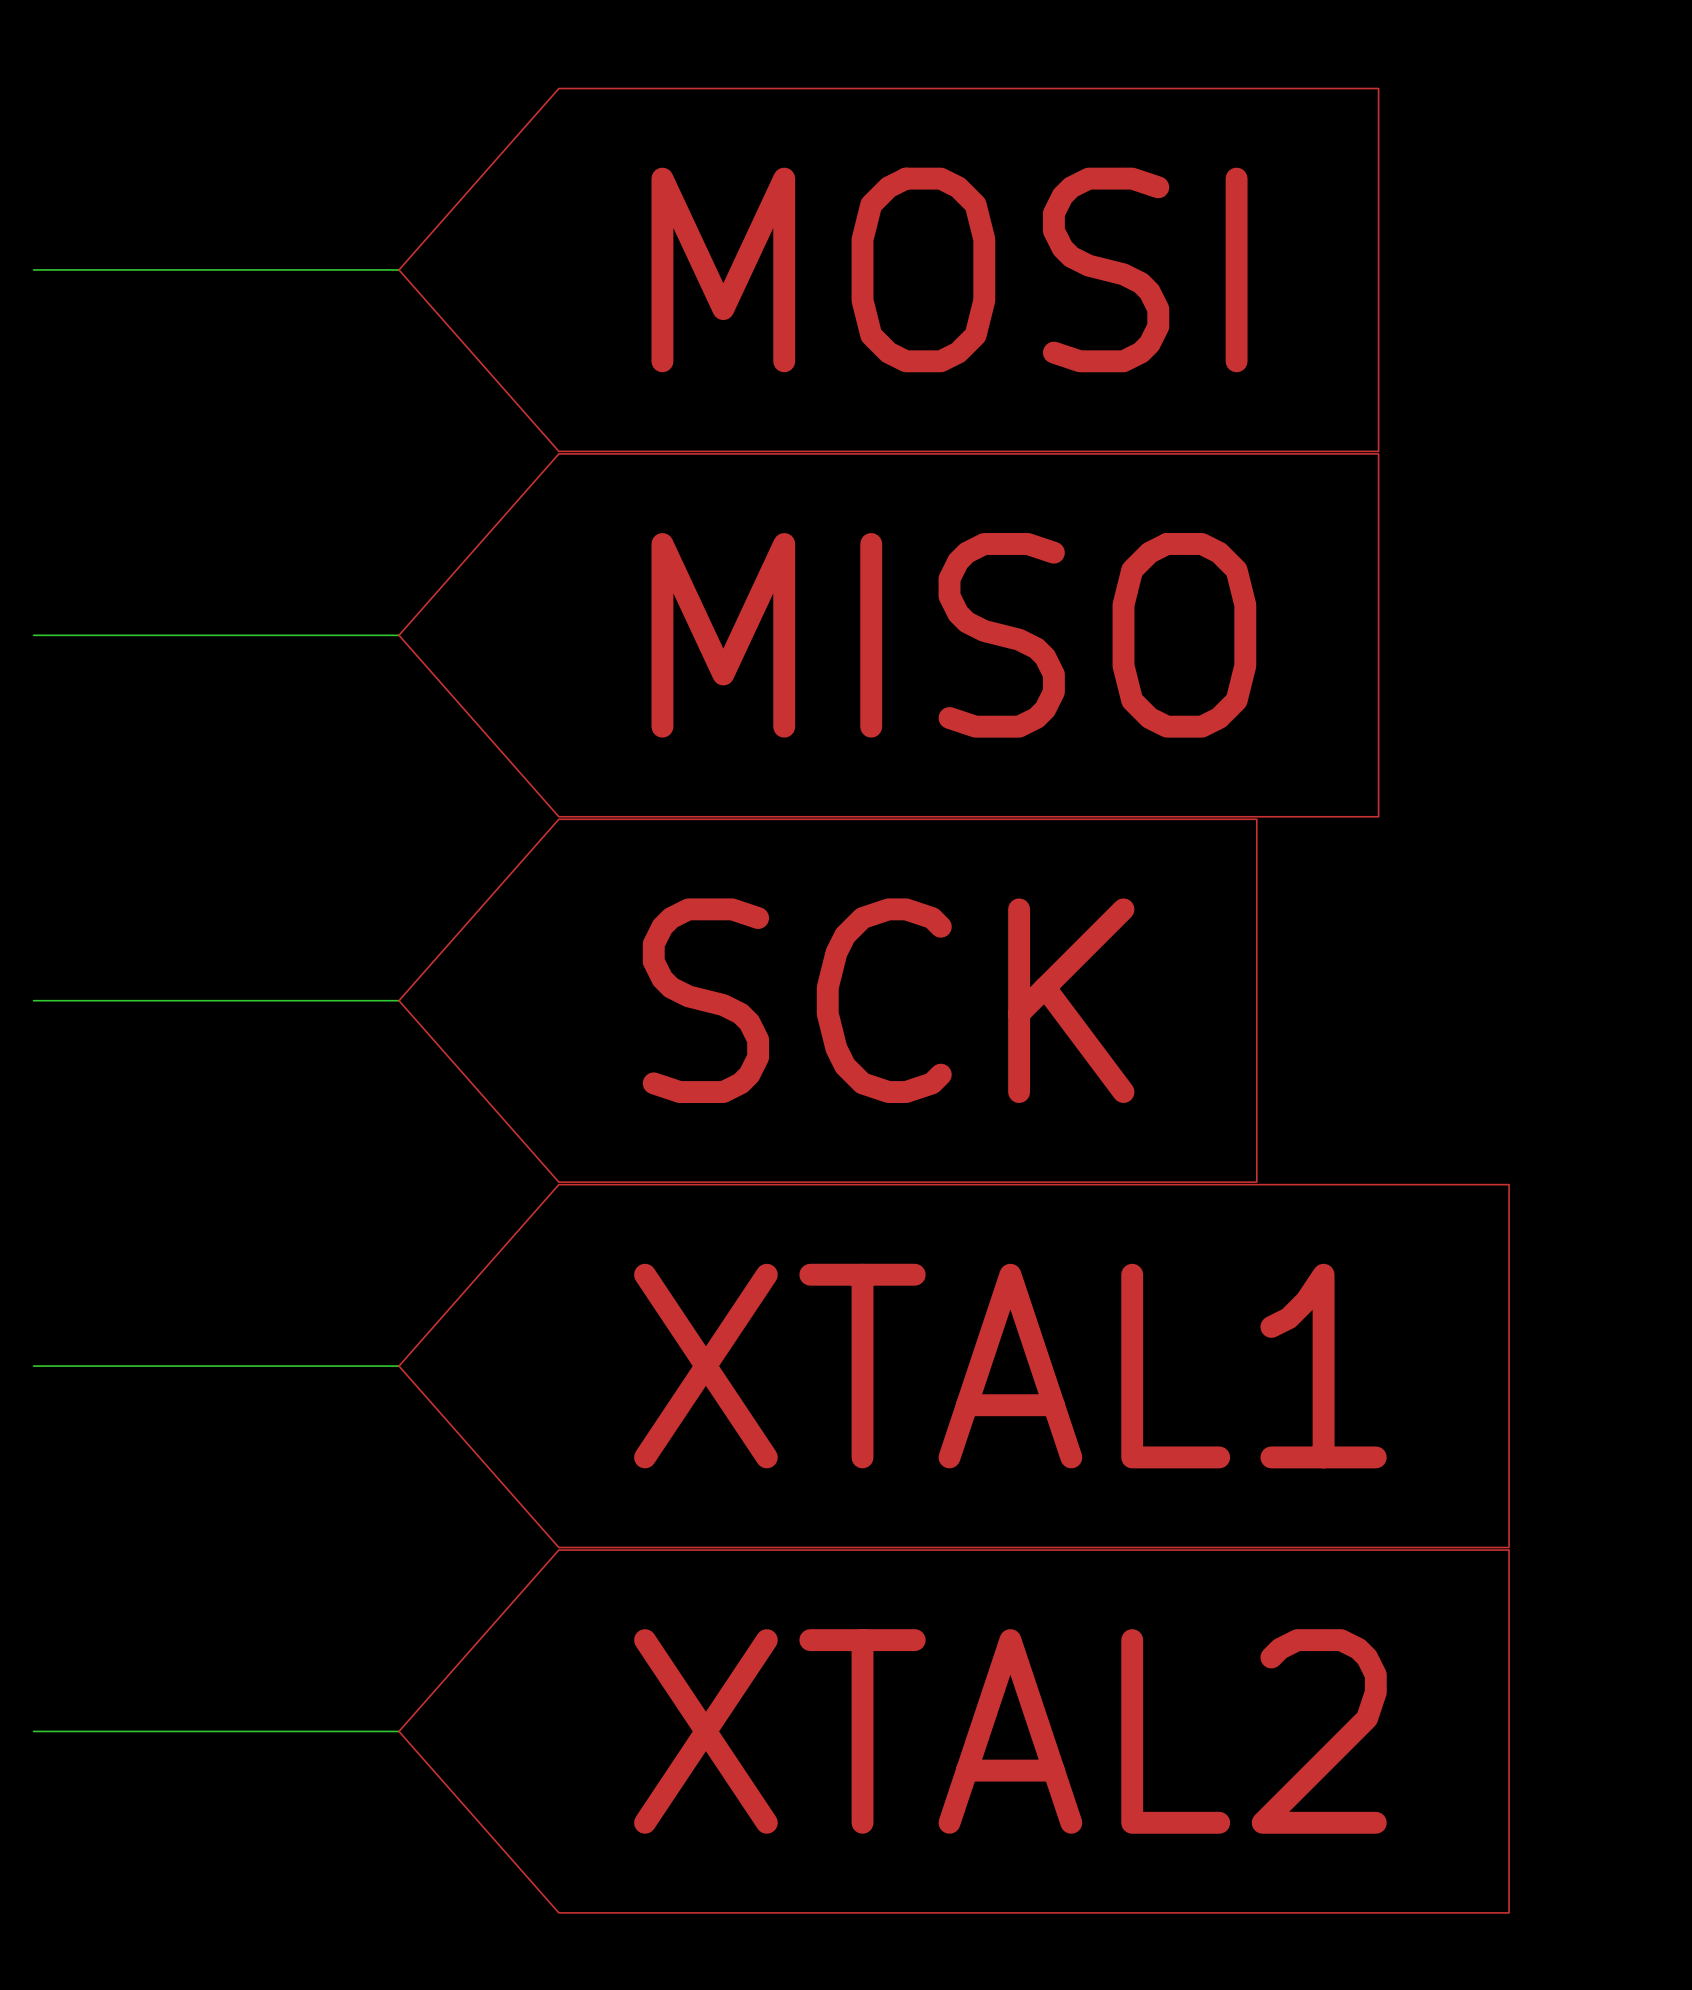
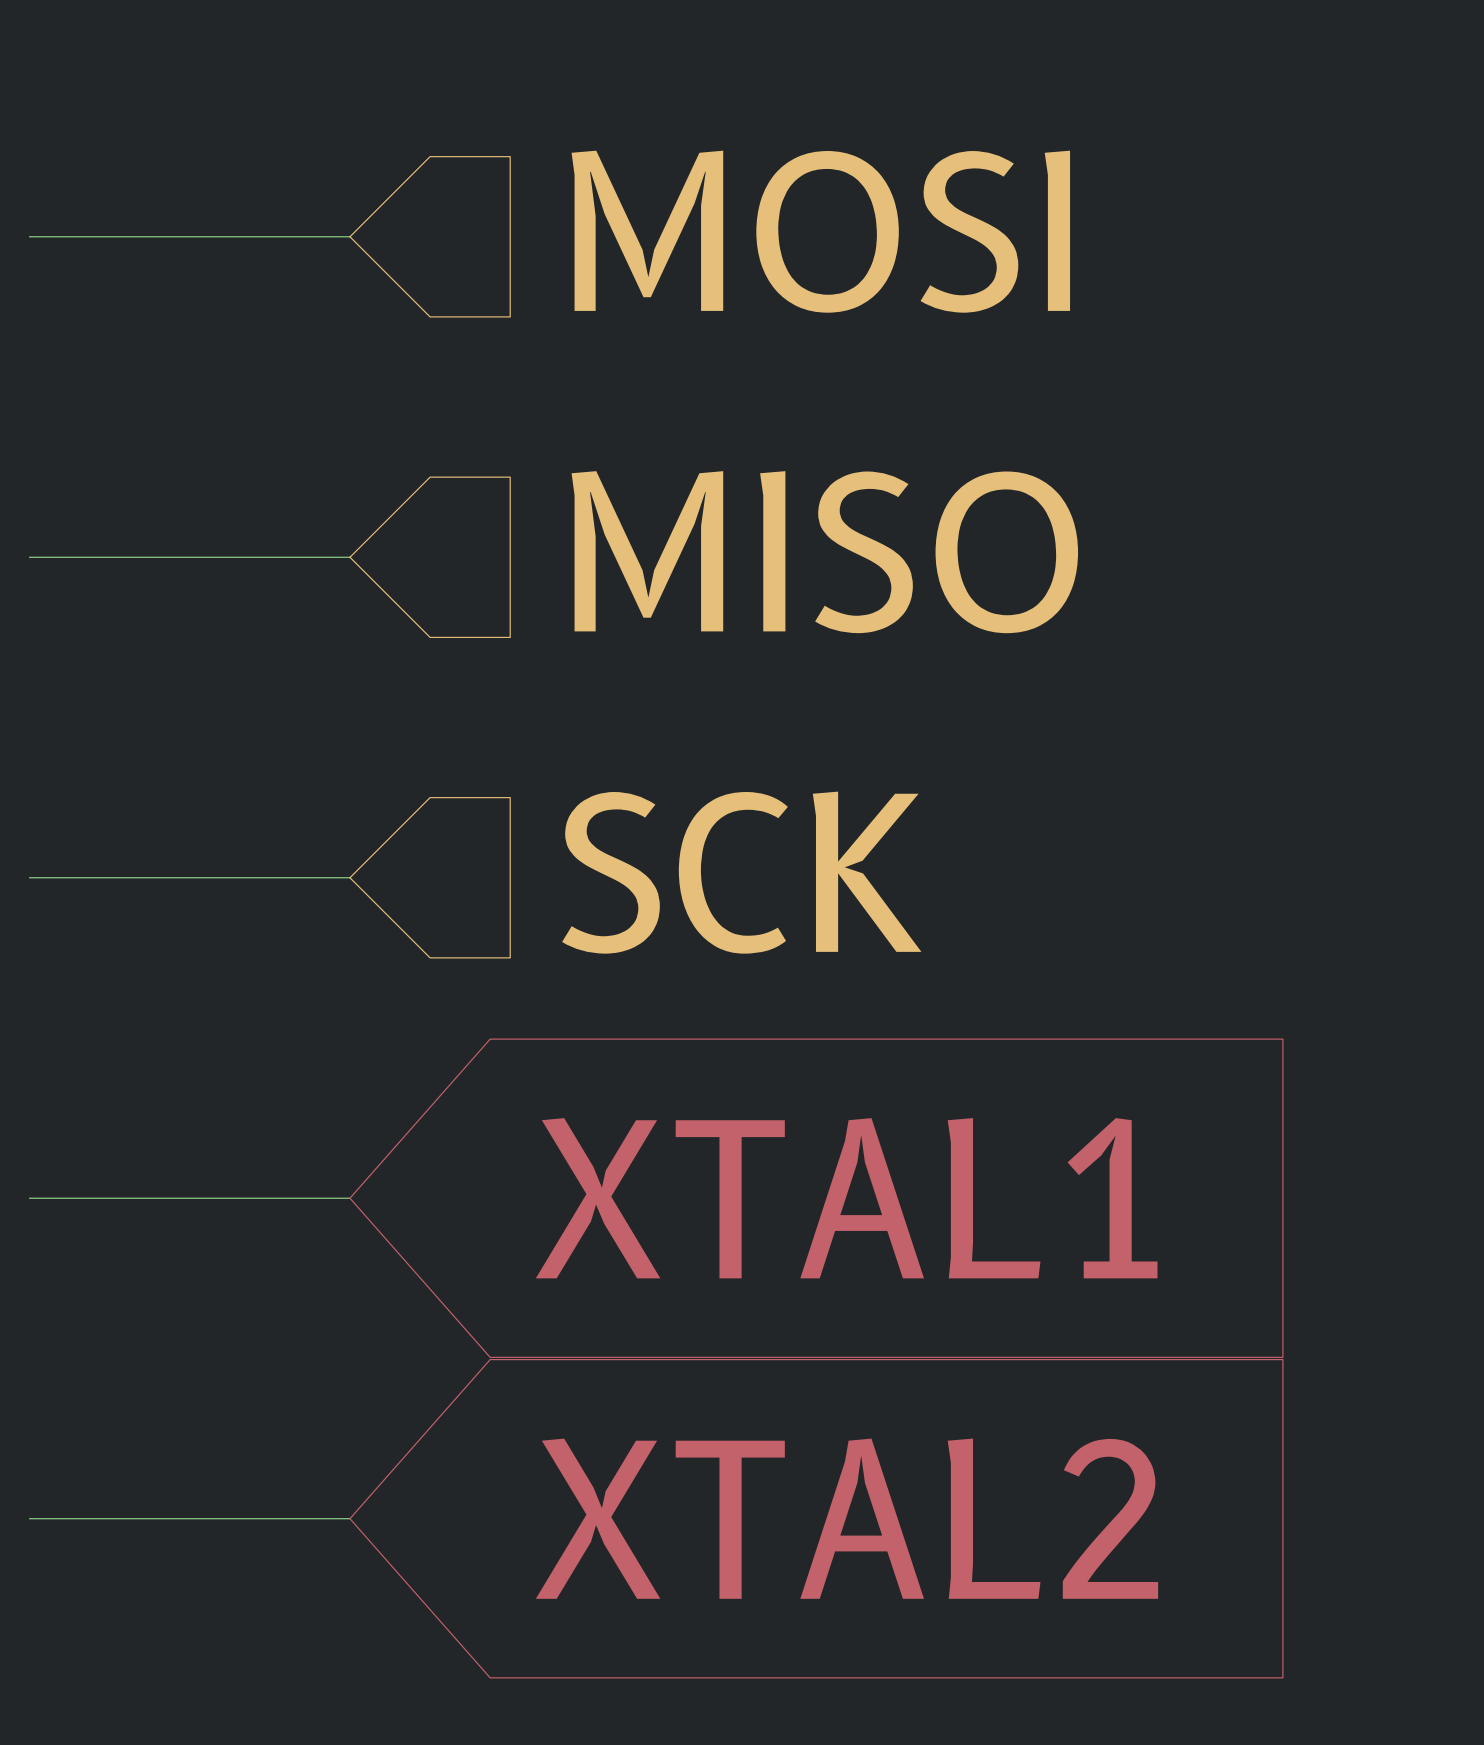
hierarchical label: none -> MOSI (820, 231)
global label: MOSI (949, 269) -> none
hierarchical label: none -> MISO (824, 552)
global label: MISO (953, 635) -> none
hierarchical label: none -> SCK (741, 872)
global label: SCK (888, 1000) -> none

